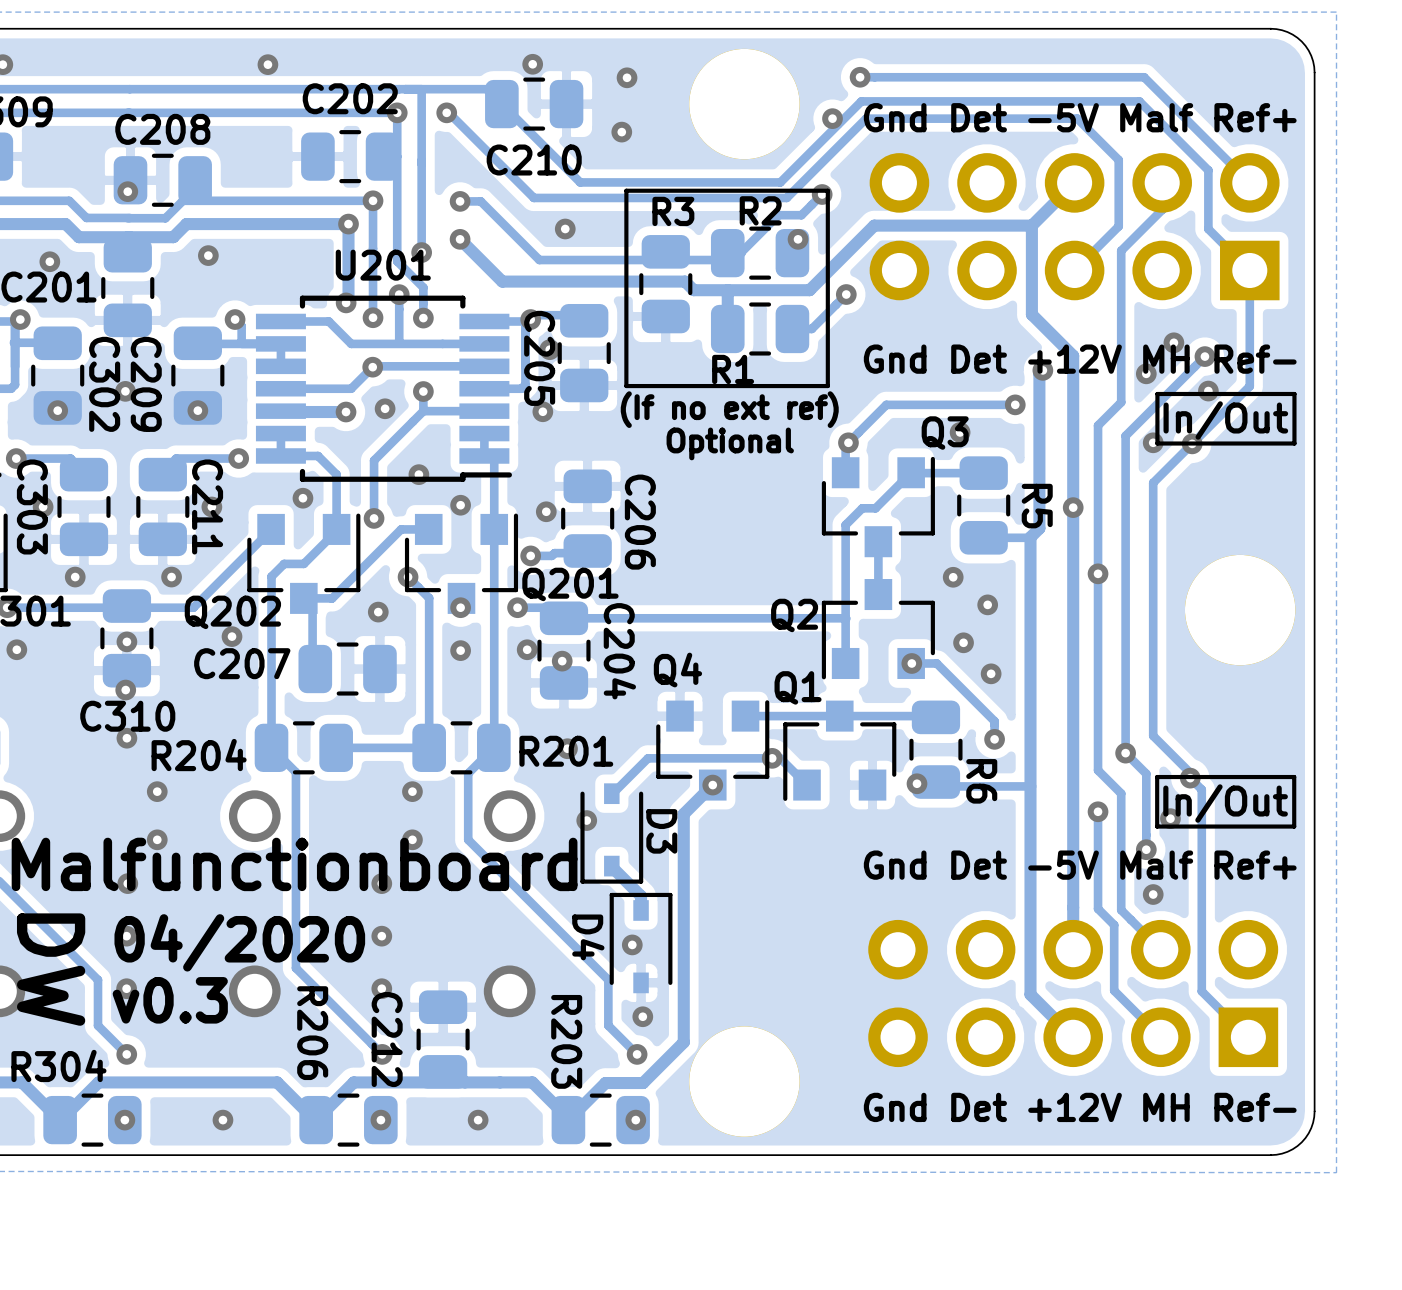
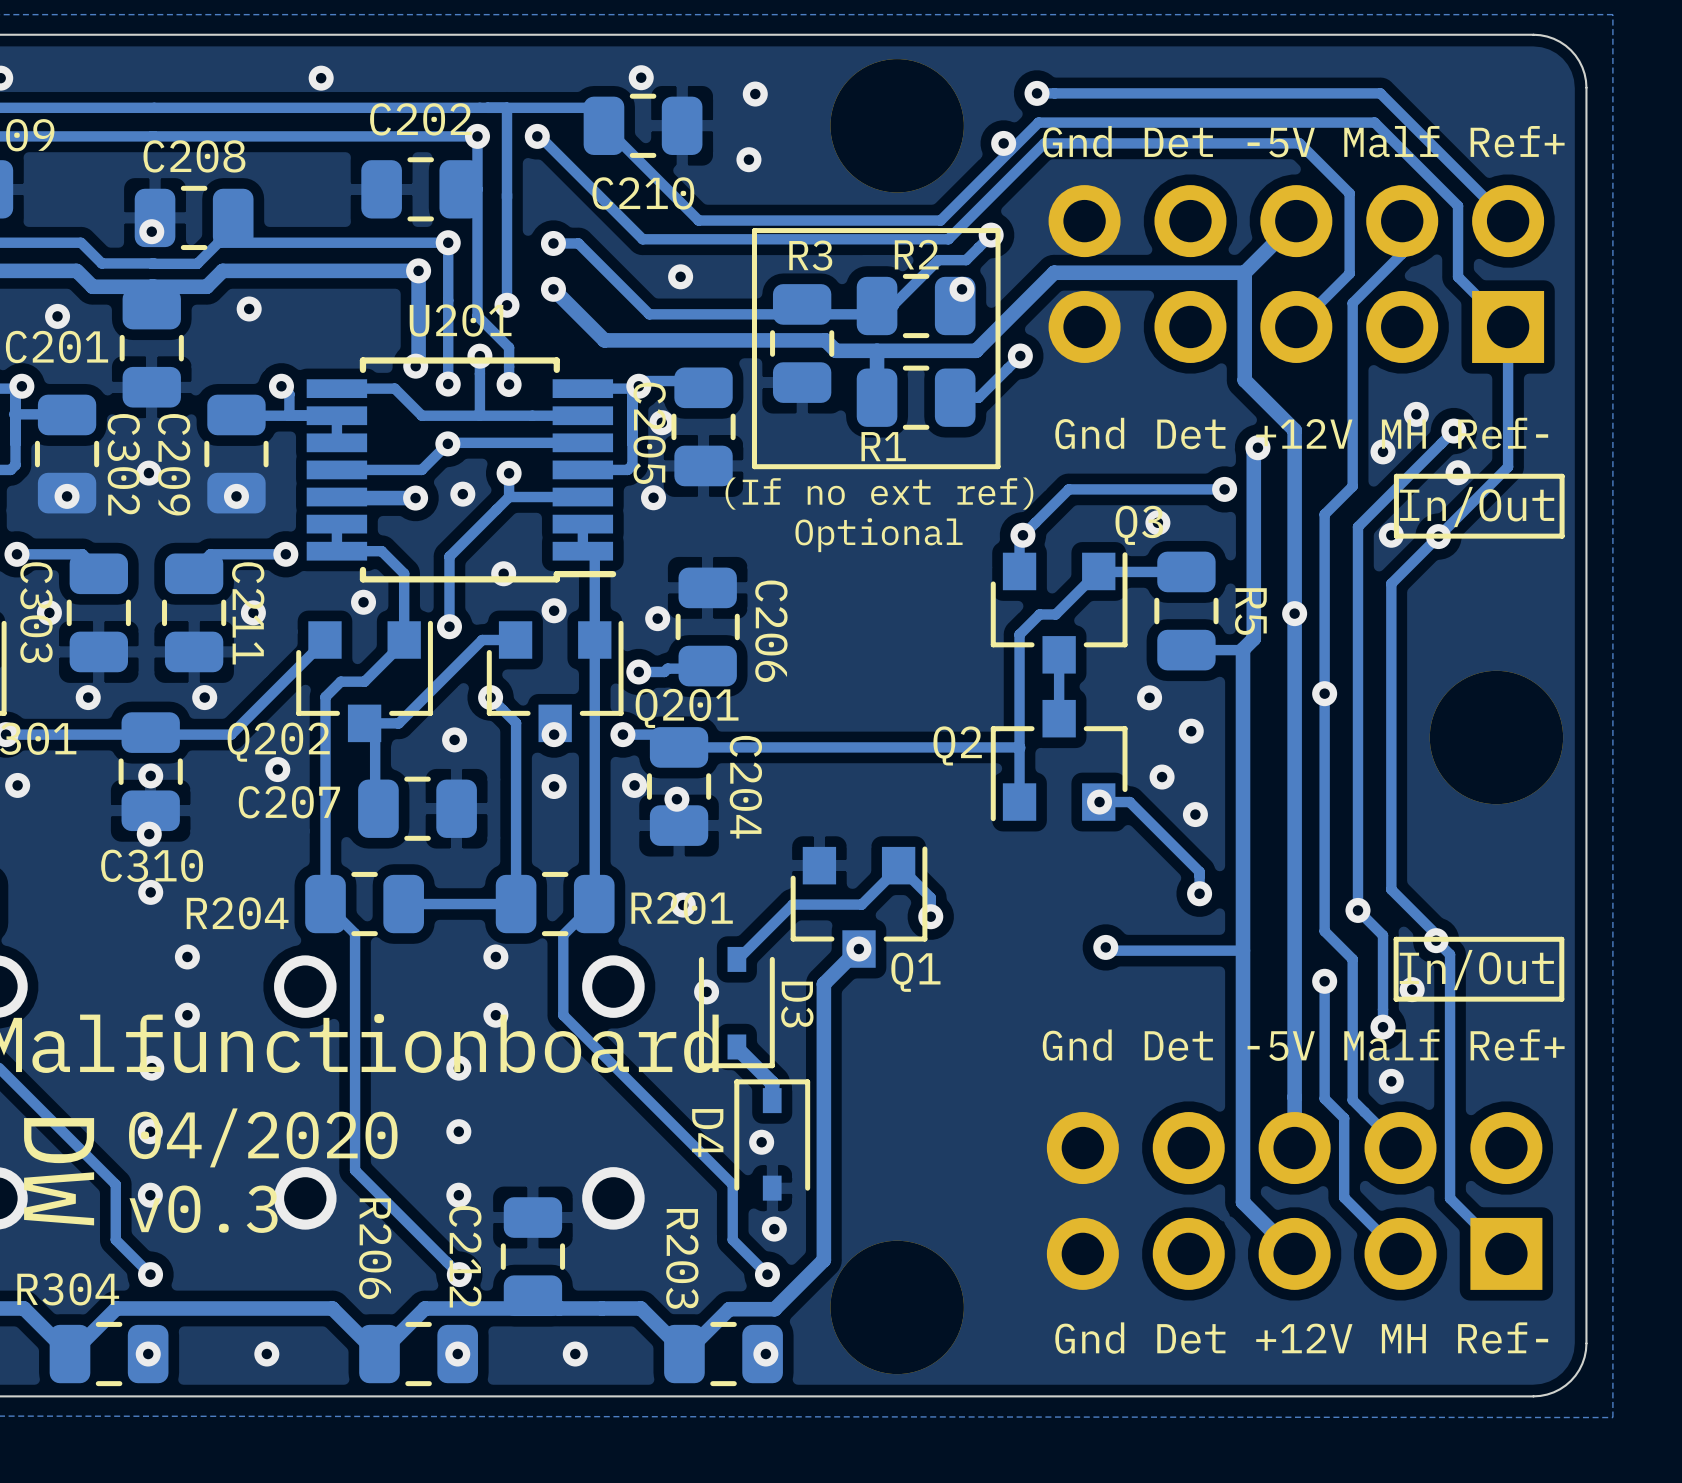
Q4 name: Q4 (677, 670) -> Q1 (915, 972)
track: (936, 716) (745, 716) -> none
R6: (935, 749) -> none
Q1: (839, 750) -> none
track: (647, 758) (780, 758) (807, 785) -> (780, 916) (792, 904) (861, 904) (898, 865) (930, 897) (930, 916)
track: none -> (1105, 947) (1109, 950) (1137, 950)

